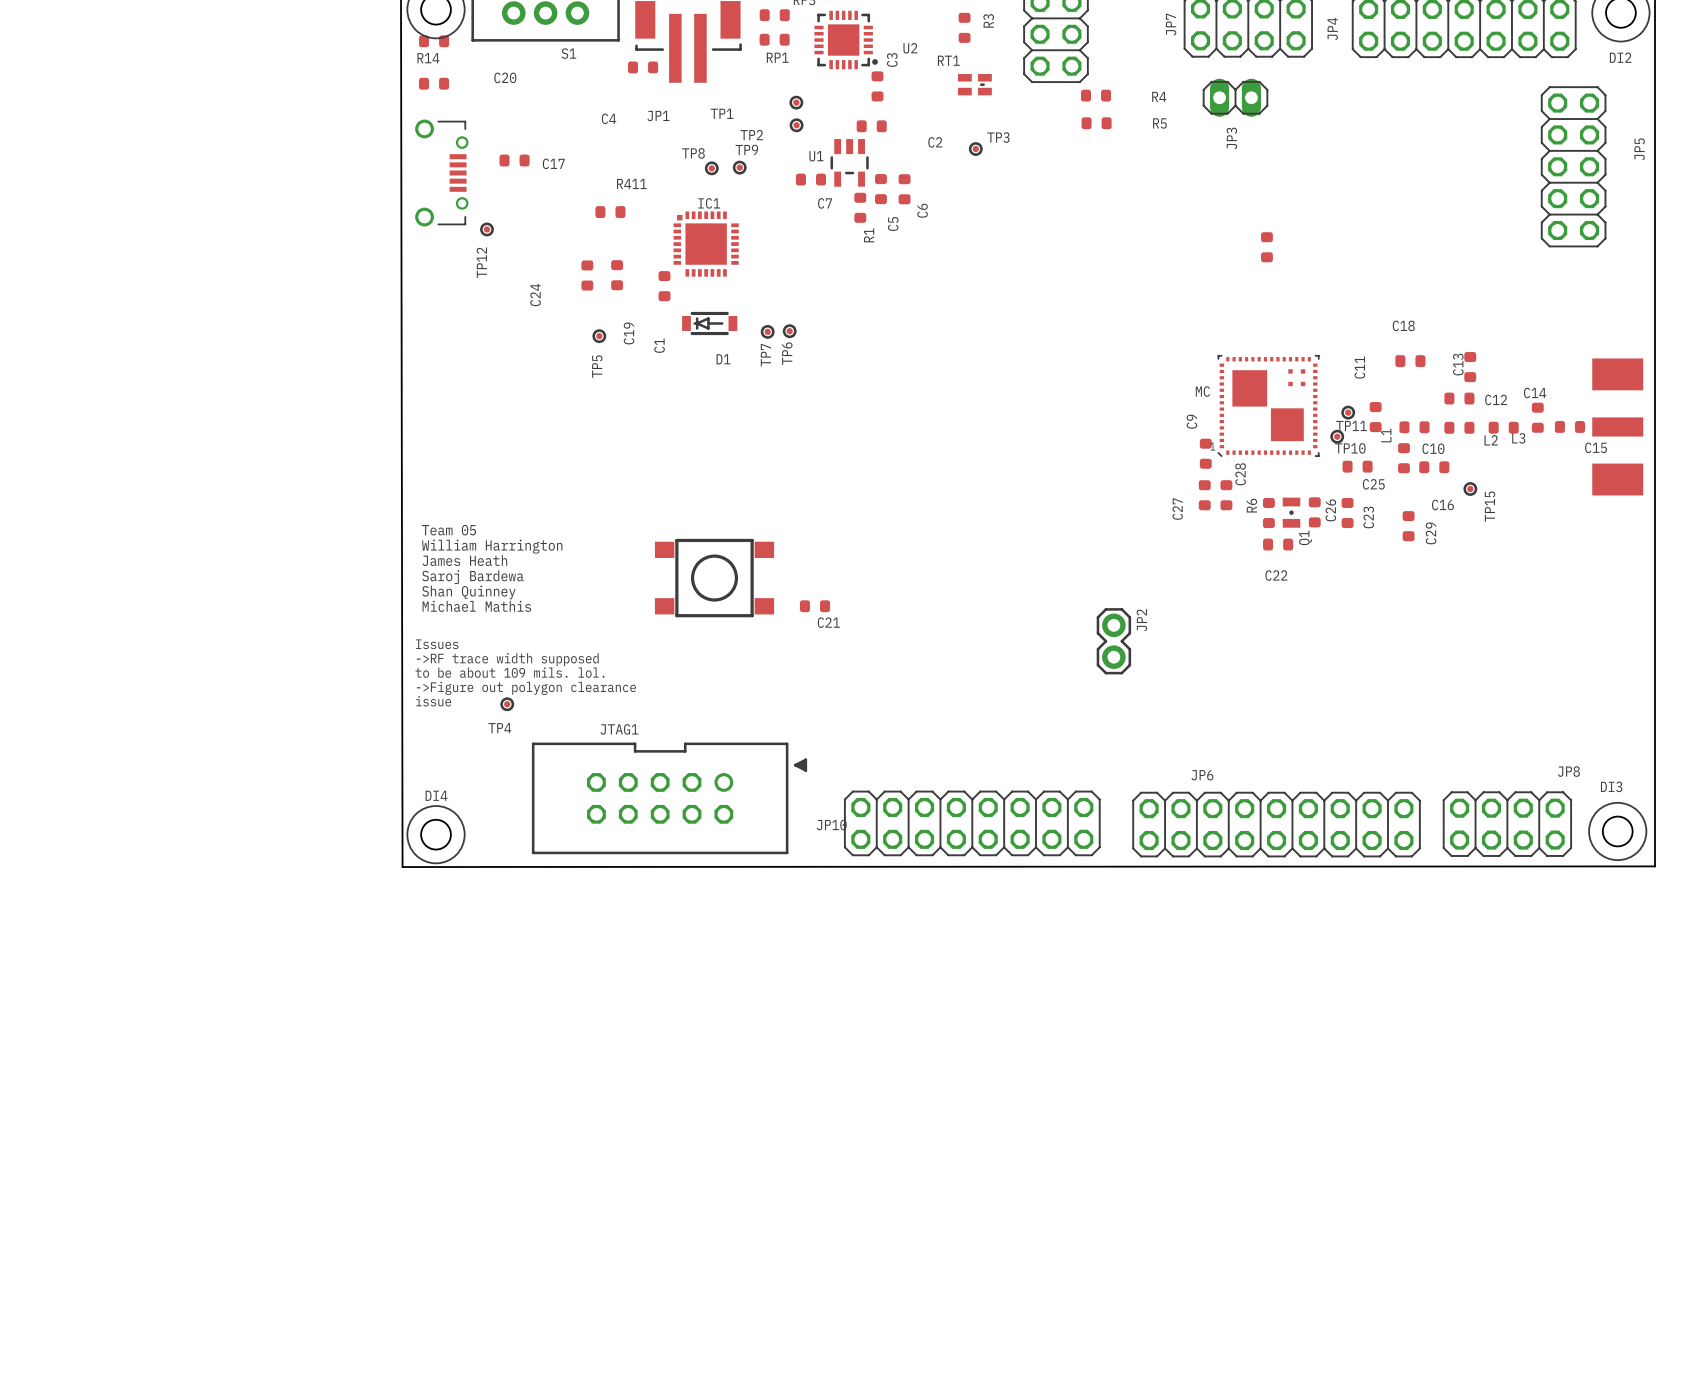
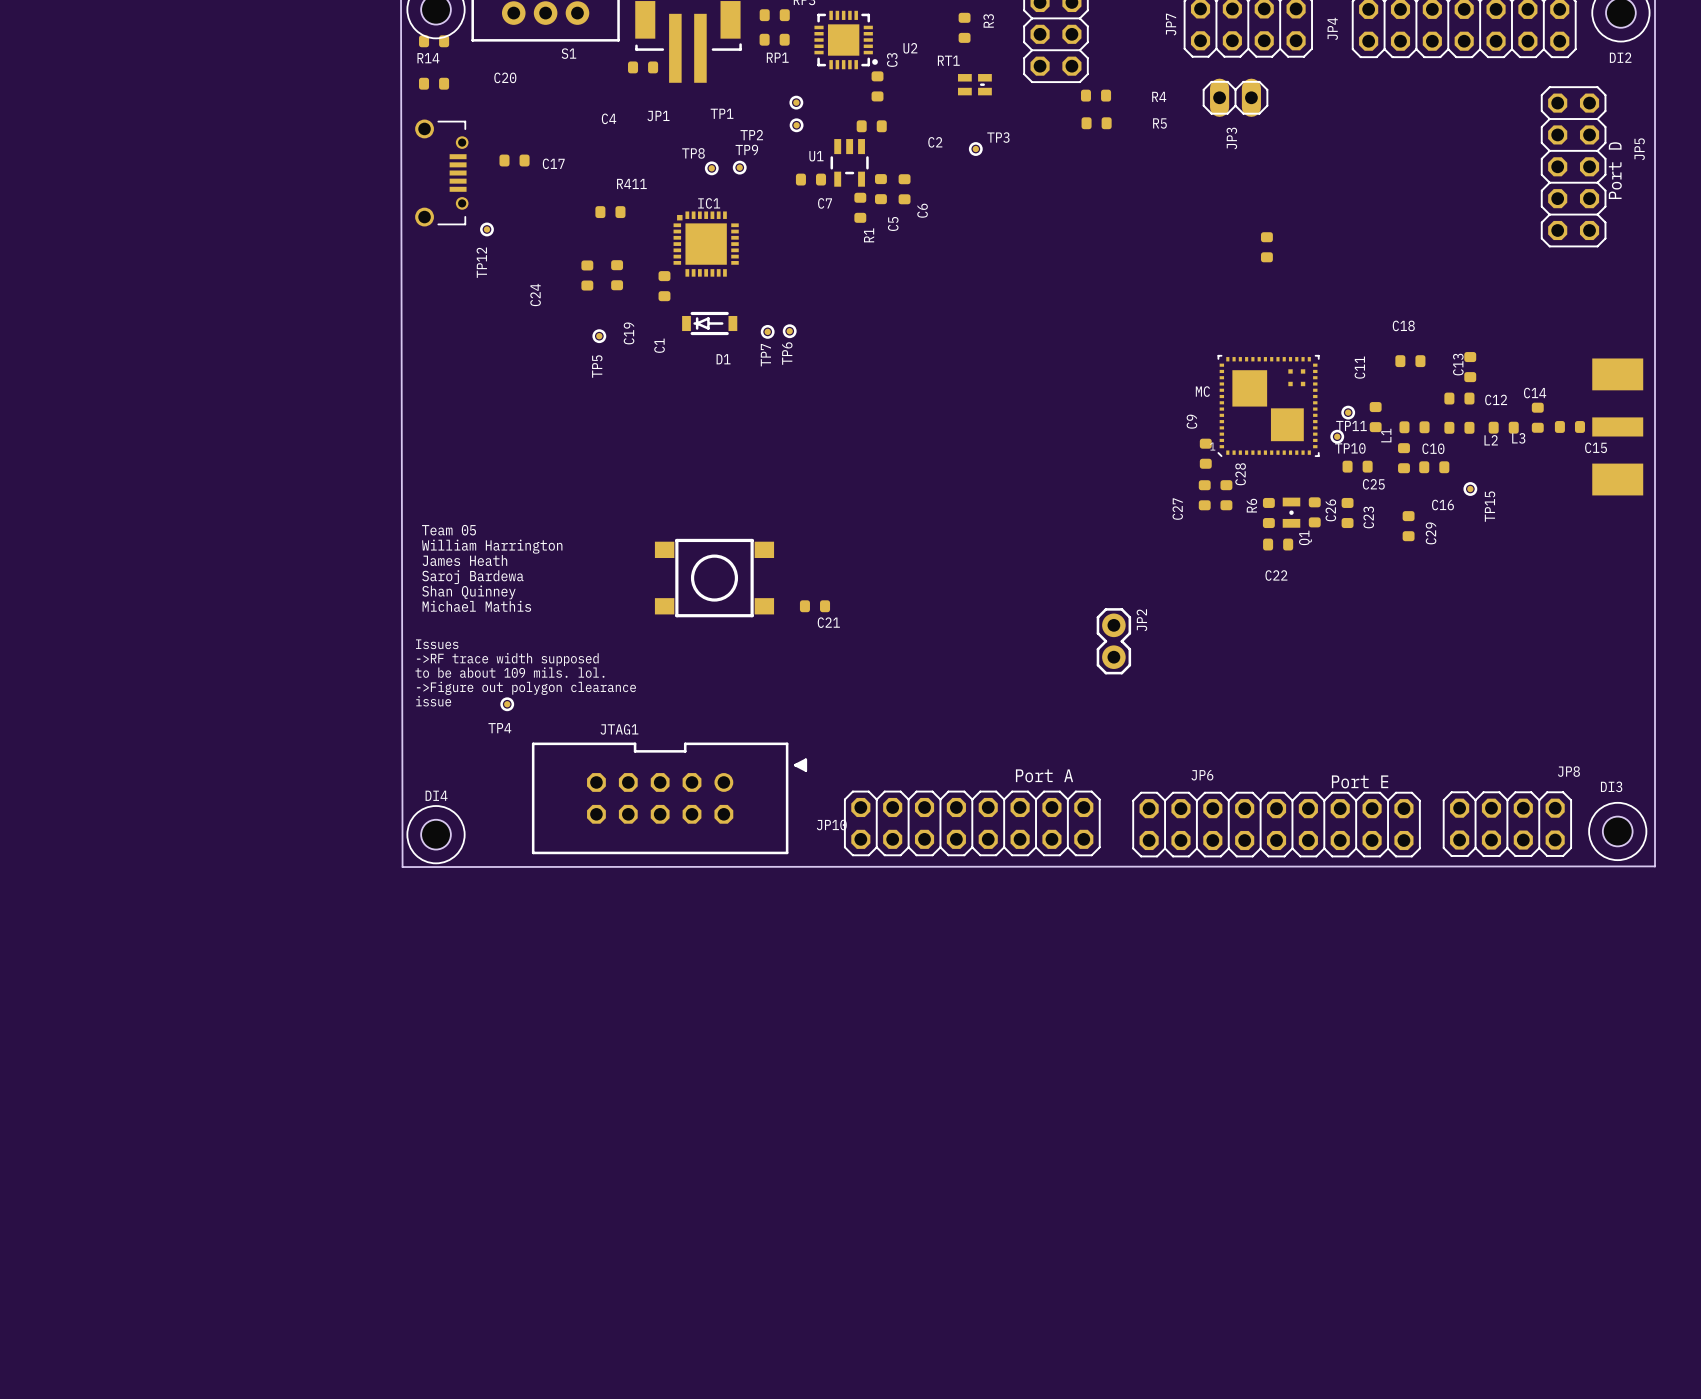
text: none -> Port D (1615, 170)
text: none -> Port A (1044, 775)
text: none -> Port E (1360, 781)

